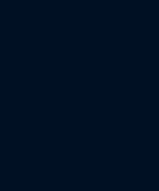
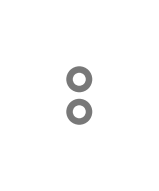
via: none -> (79, 79)
via: none -> (79, 111)

